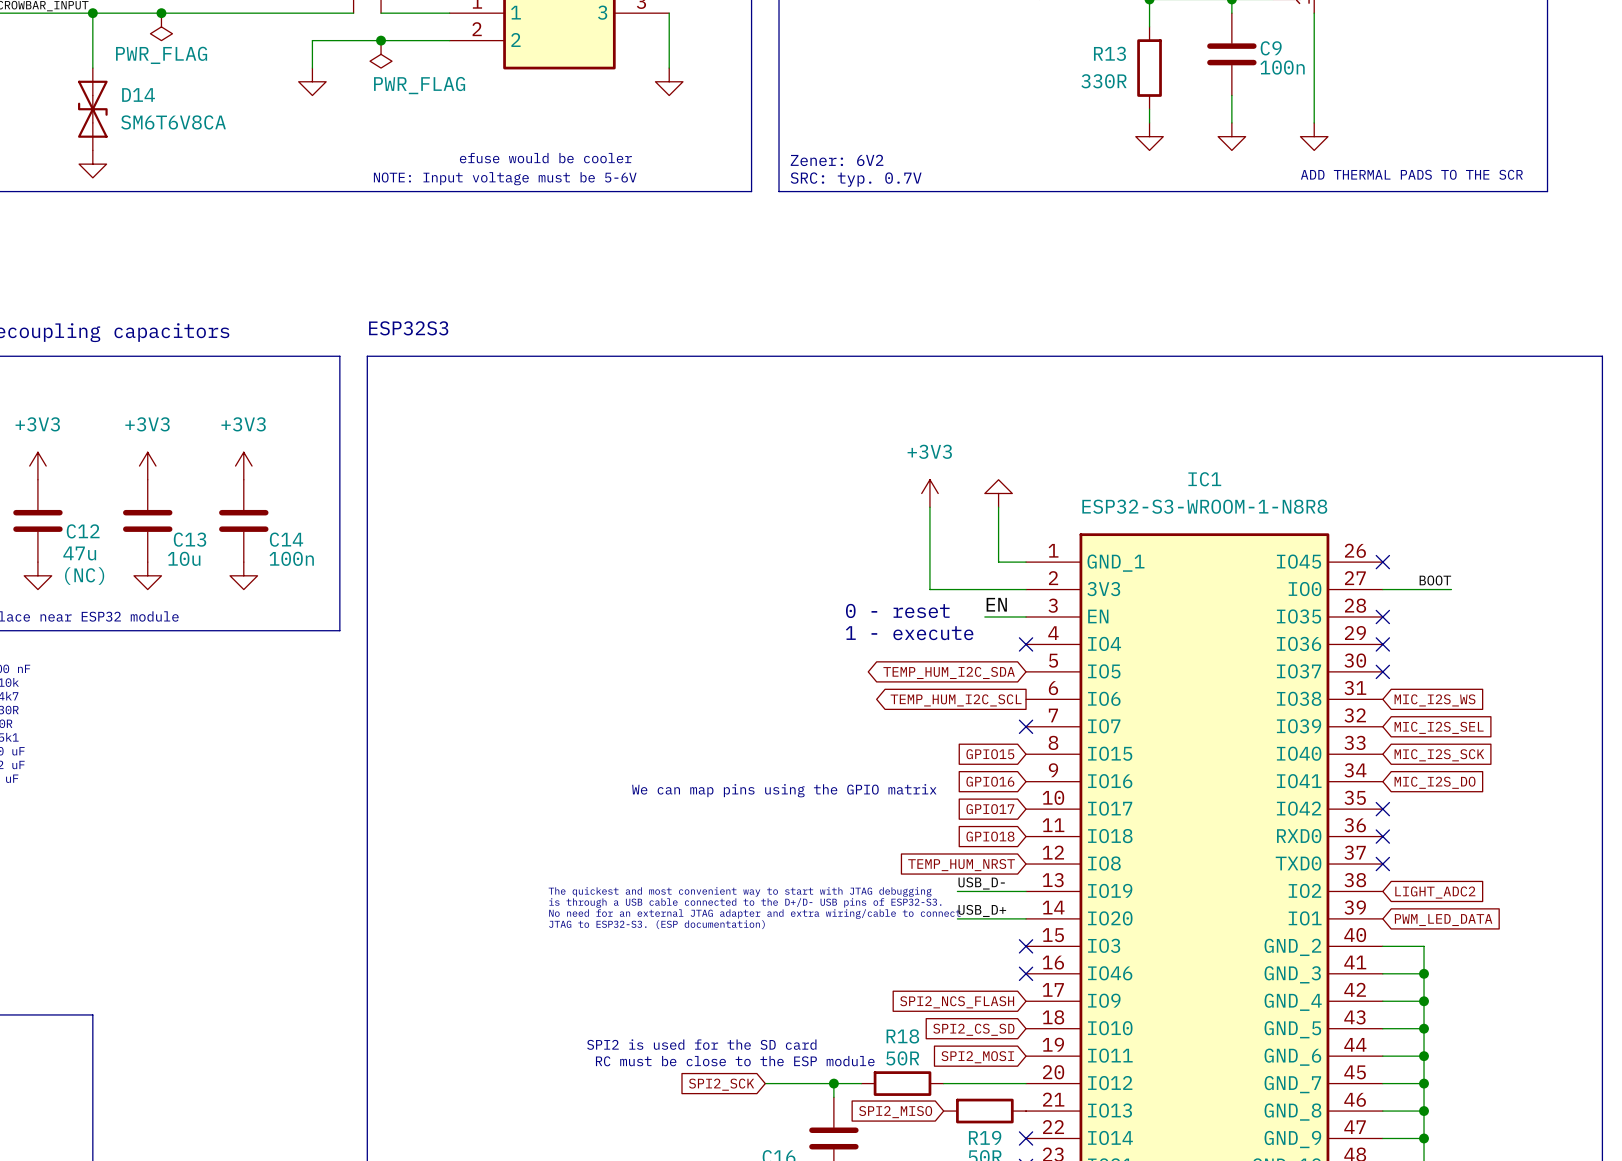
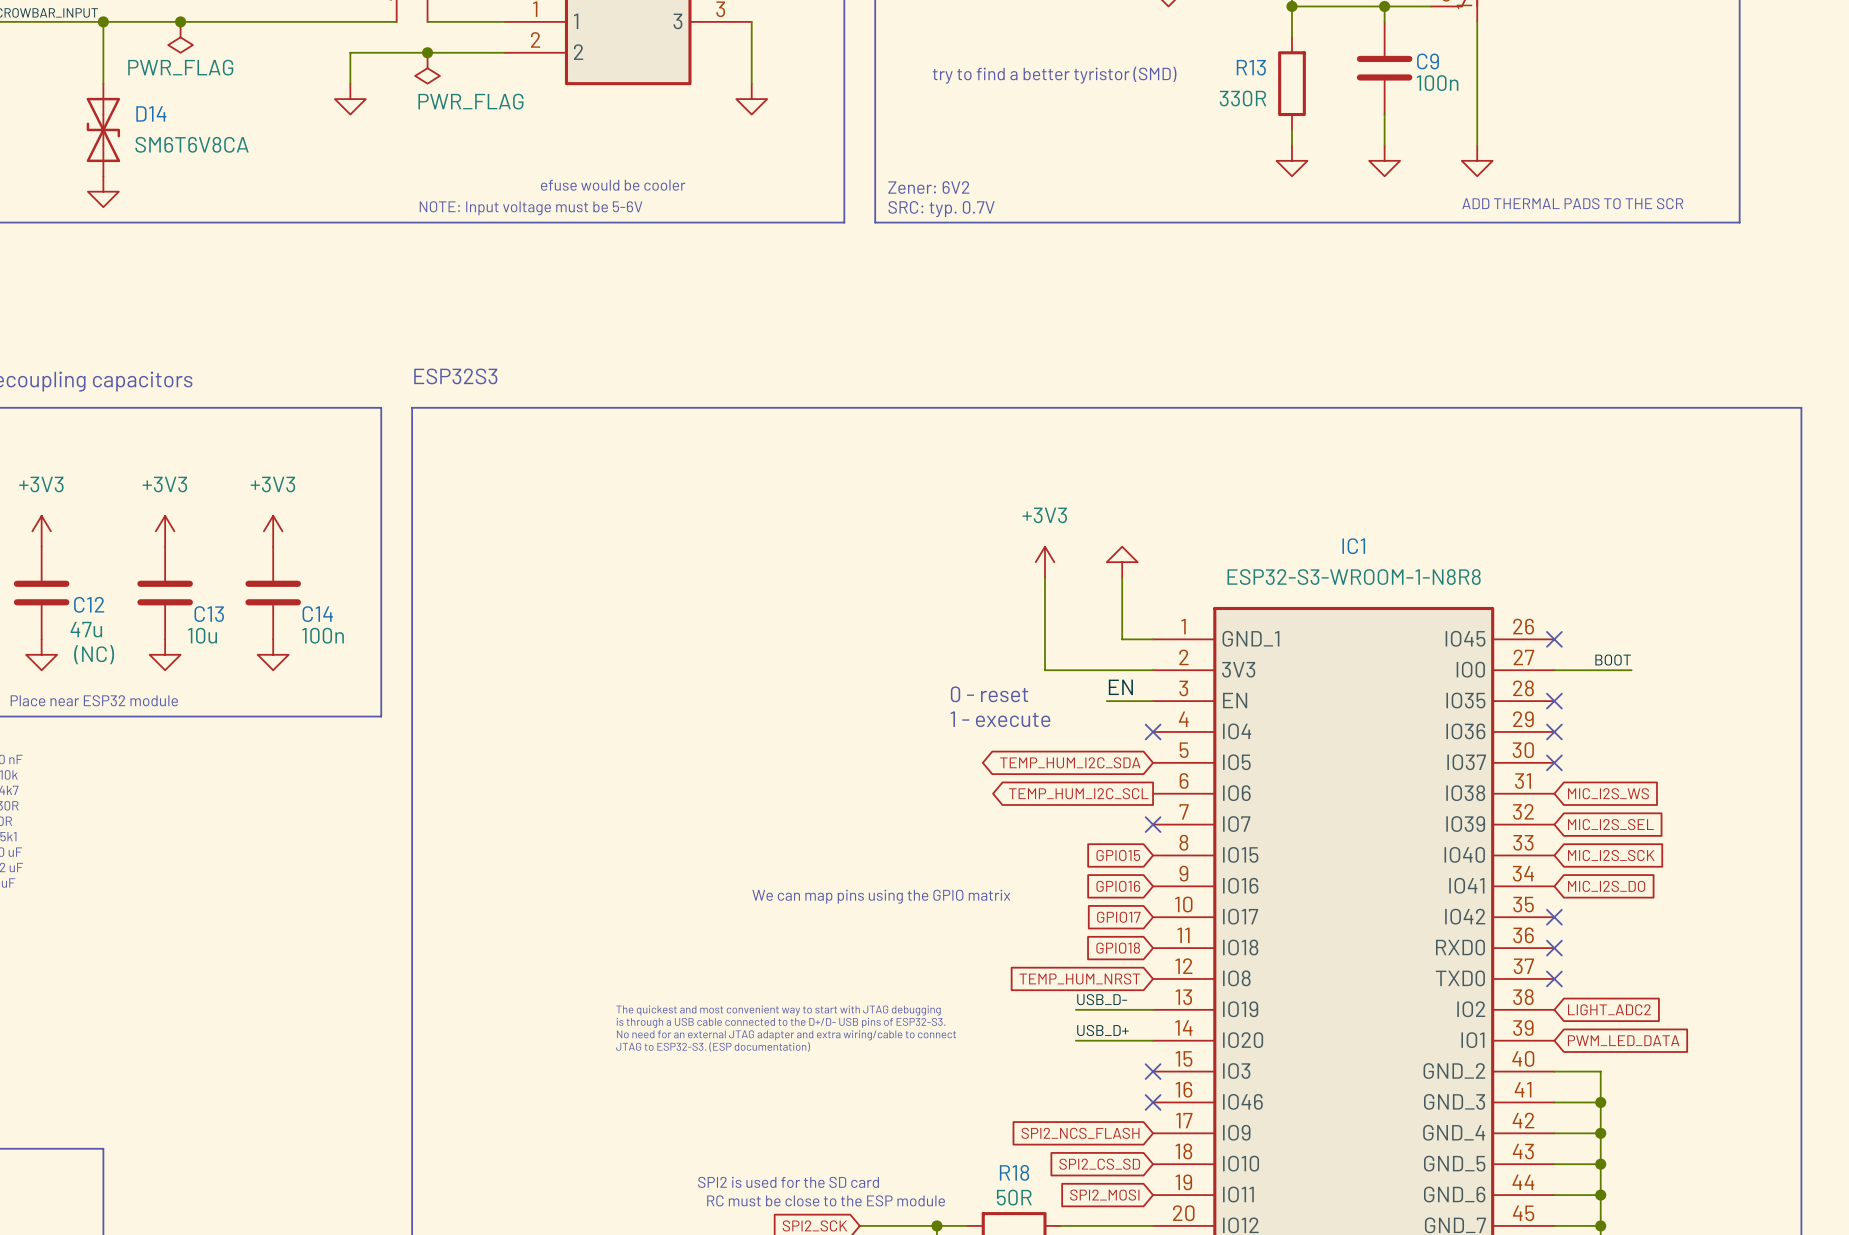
text: none -> try to find a better tyristor (SMD) (1054, 75)

